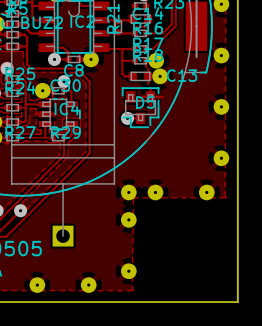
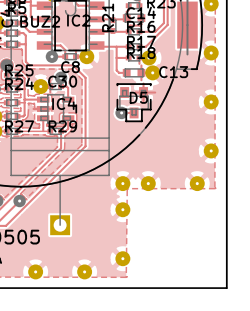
D5 footprint: [121, 87, 160, 129] -> [116, 83, 152, 123]
IC4 footprint: [38, 97, 81, 131] -> [37, 94, 78, 124]

